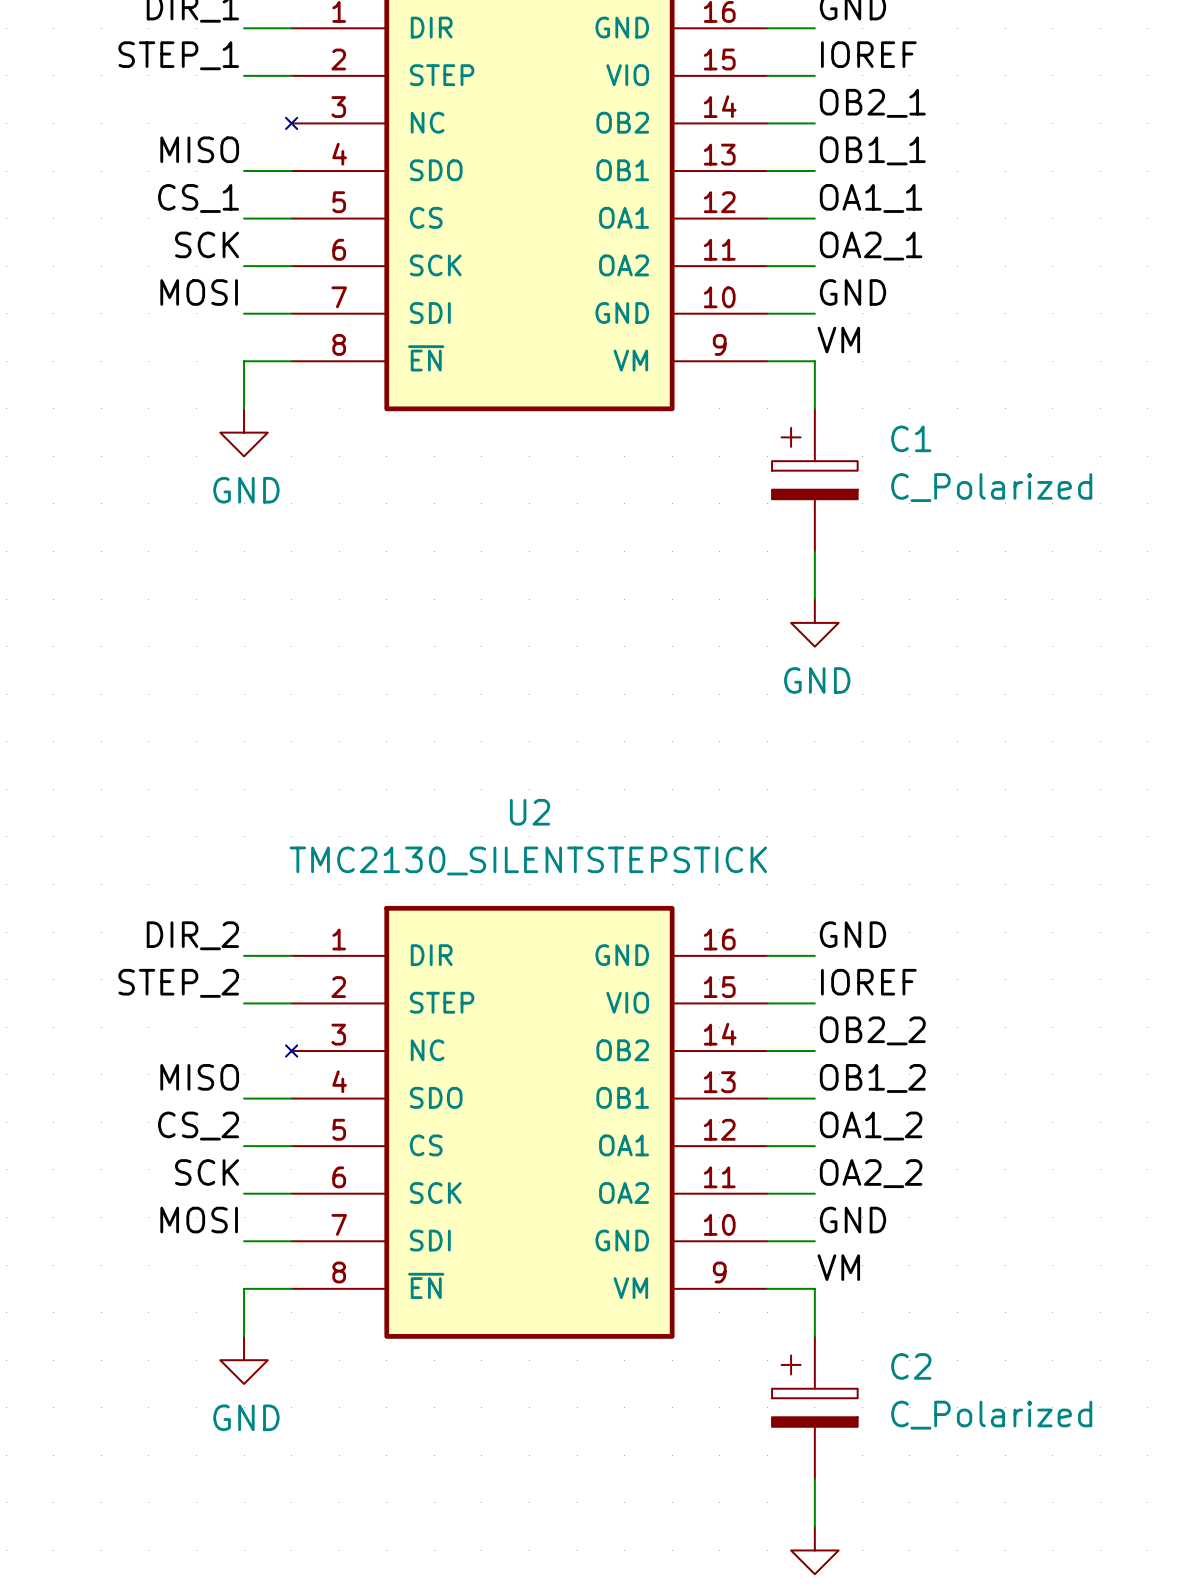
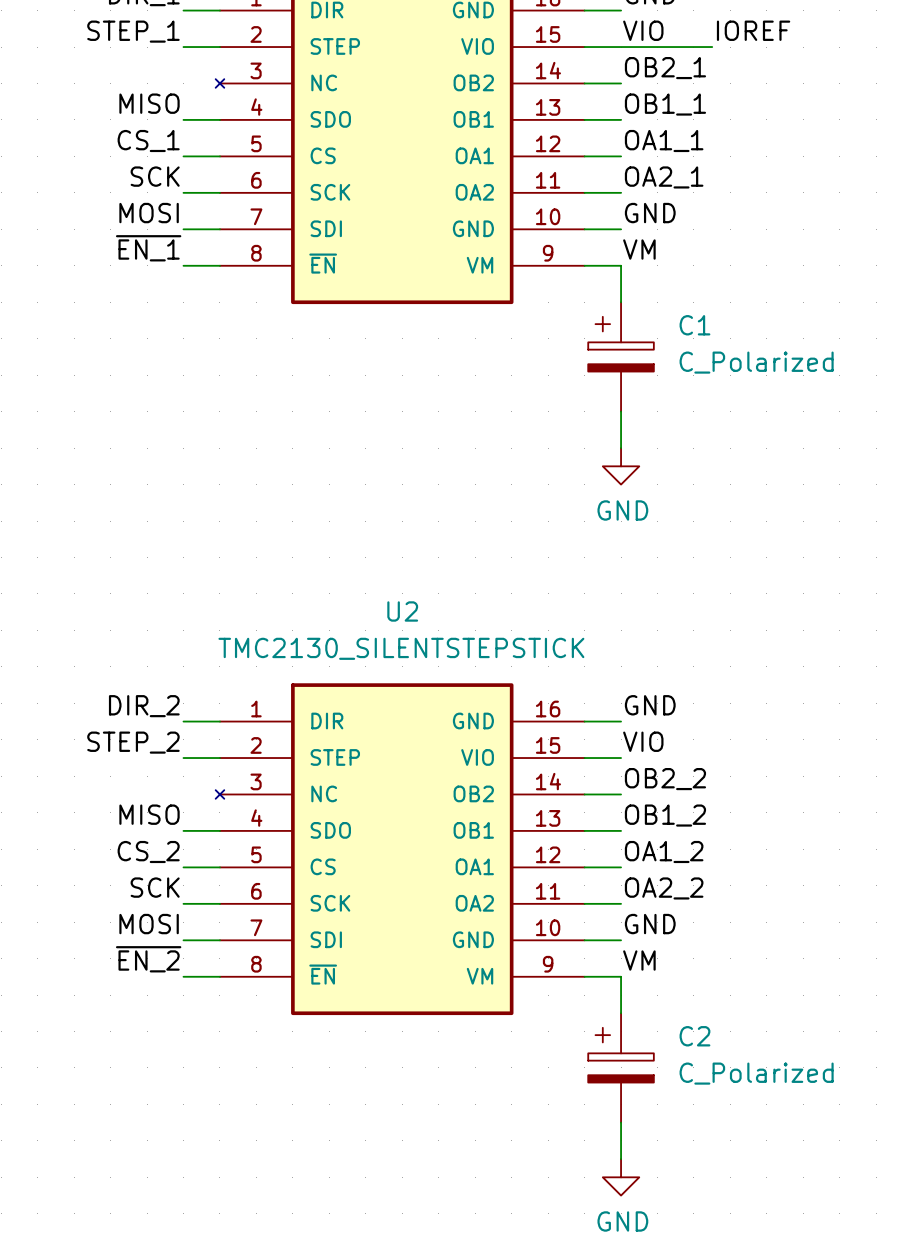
label: IOREF (868, 54) -> VIO (643, 30)
label: none -> IOREF (753, 30)
wire: none -> (621, 47) (712, 47)
label: none -> ~{EN_1} (148, 248)
wire: (244, 361) (244, 408) -> none
power symbol: GND (244, 432) -> none
label: IOREF (868, 982) -> VIO (643, 741)
label: none -> ~{EN_2} (148, 959)
wire: (244, 1288) (244, 1336) -> none
power symbol: GND (244, 1360) -> none

